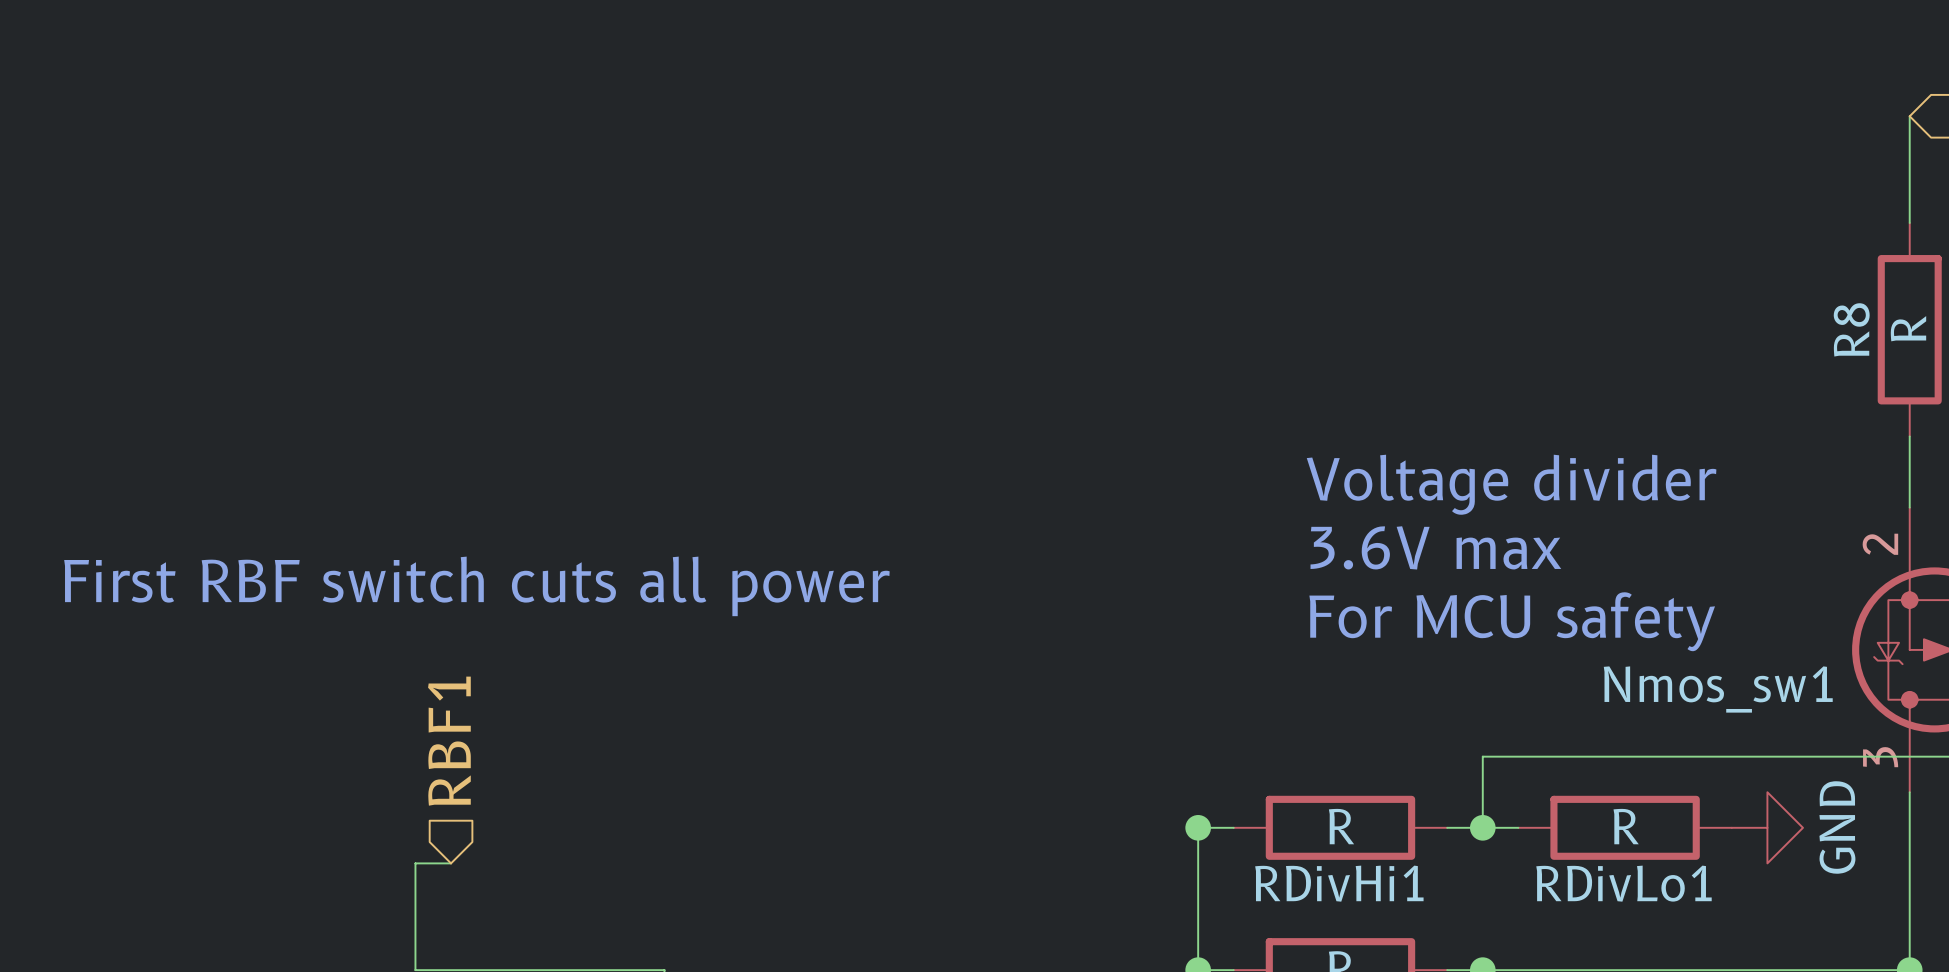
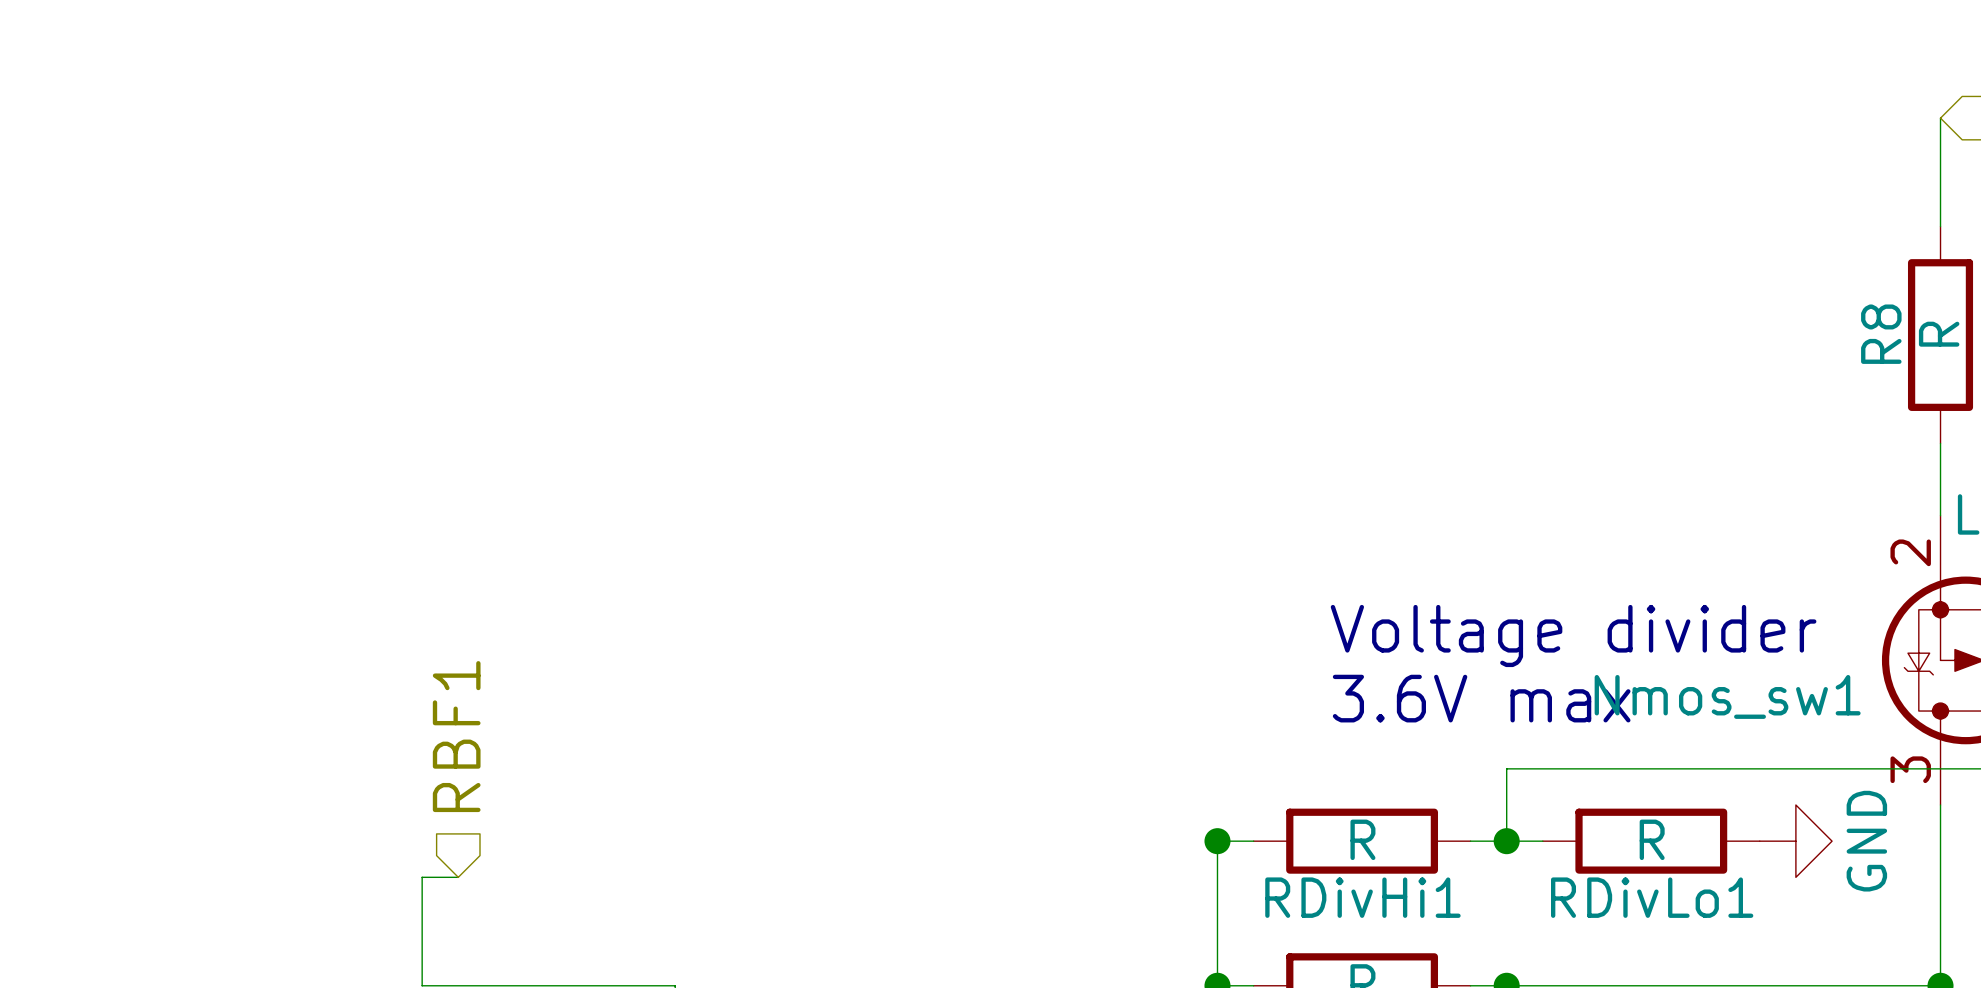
text: Voltage divider (1511, 484) -> none
text position: 3.6V max (1435, 547) -> 3.6V max (1481, 698)
text: First RBF switch cuts all power (476, 586) -> none
text: For MCU safety (1512, 621) -> Voltage divider (1573, 635)

